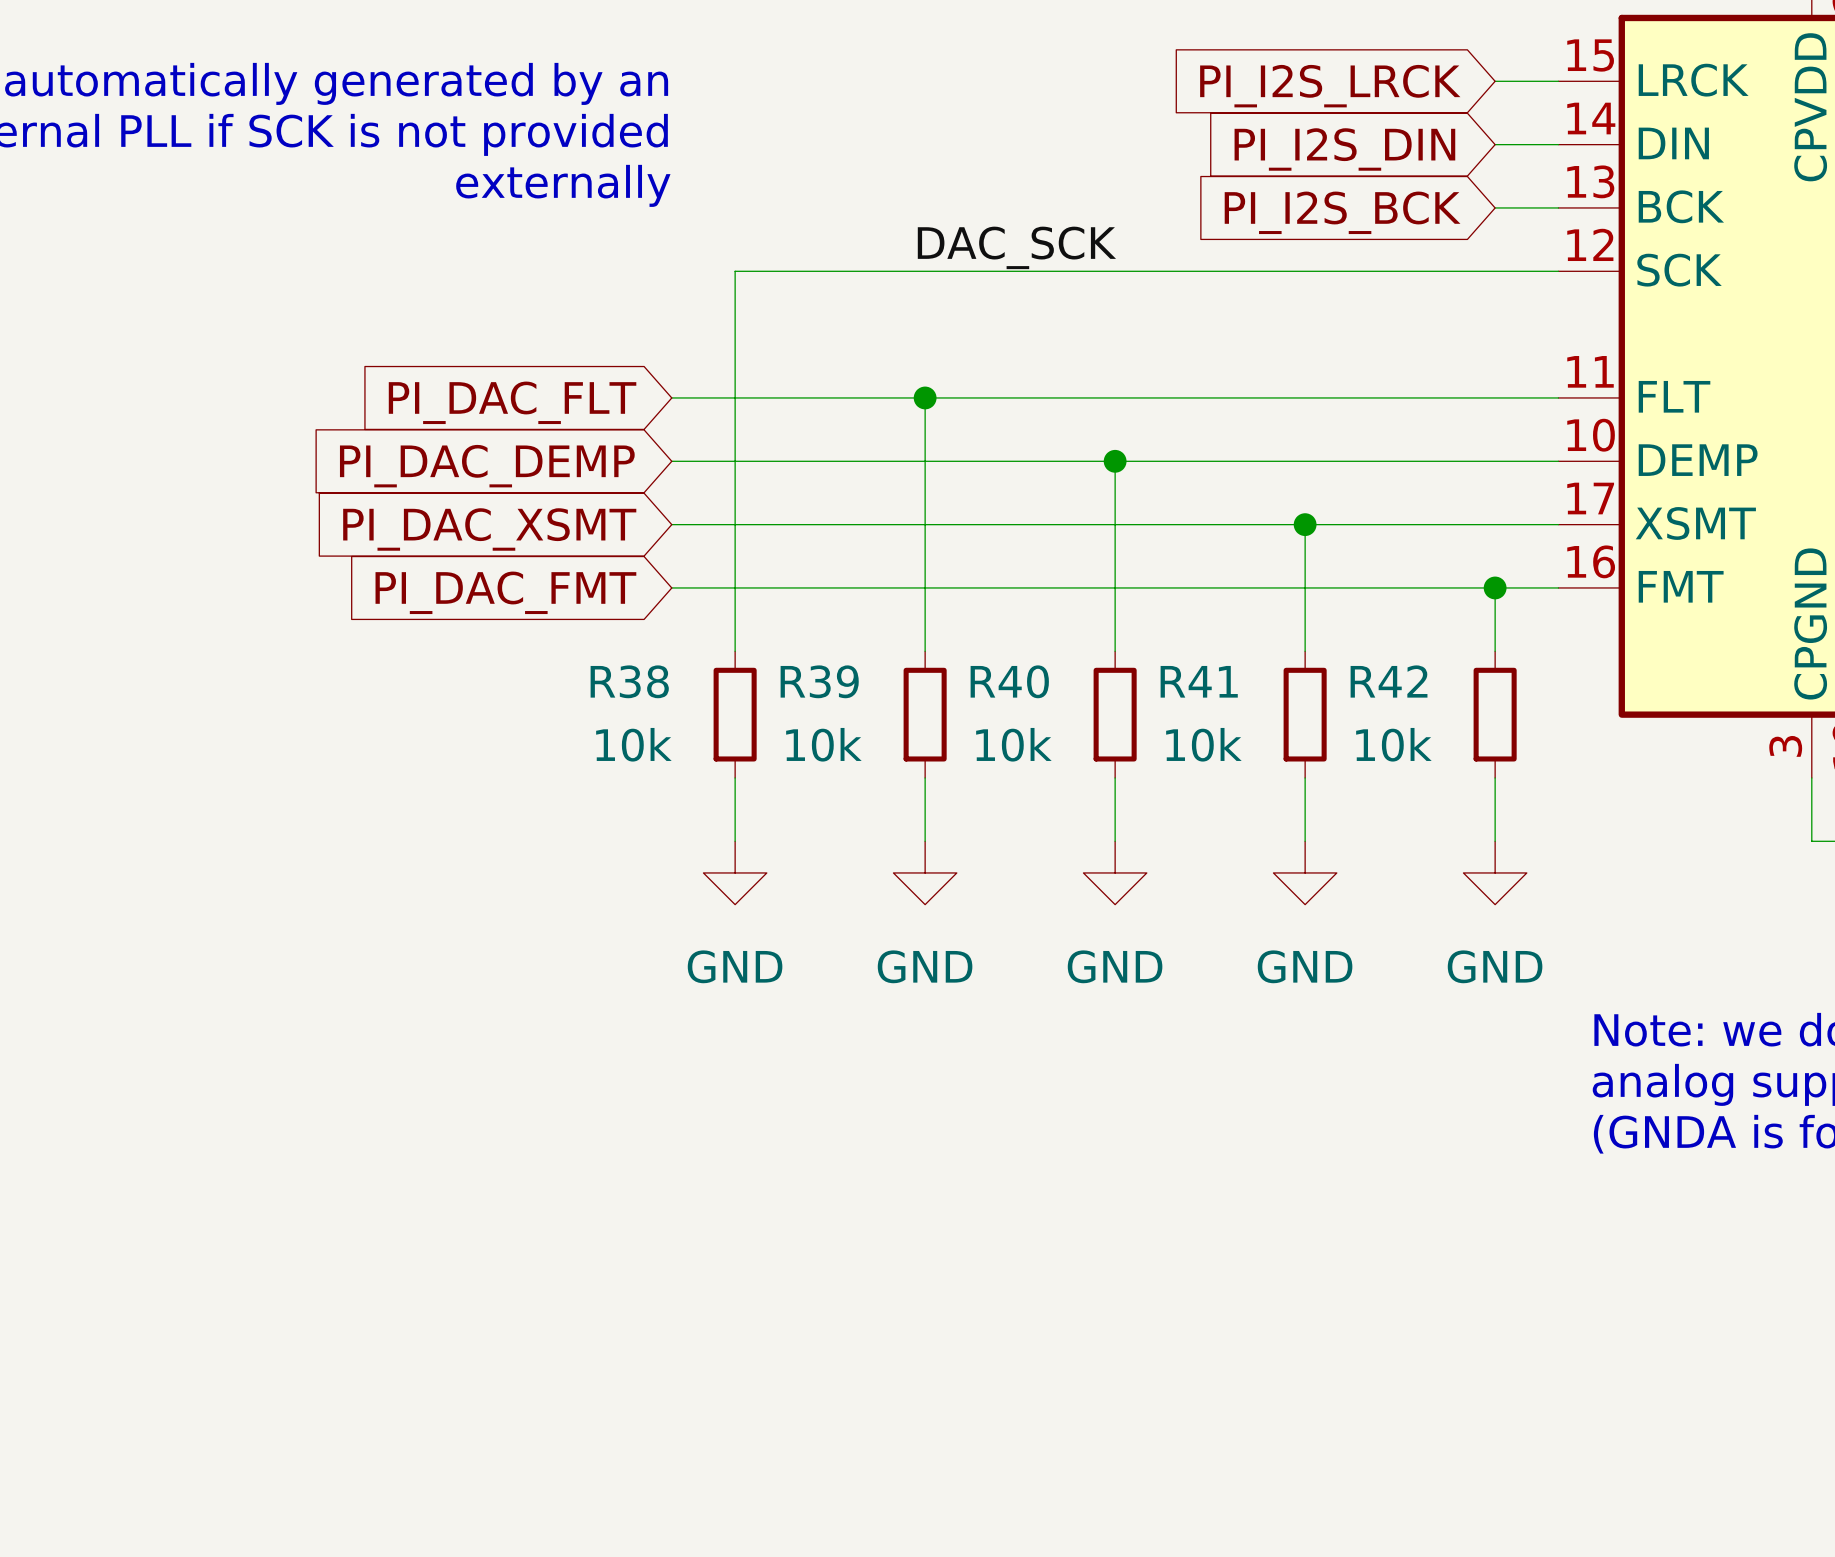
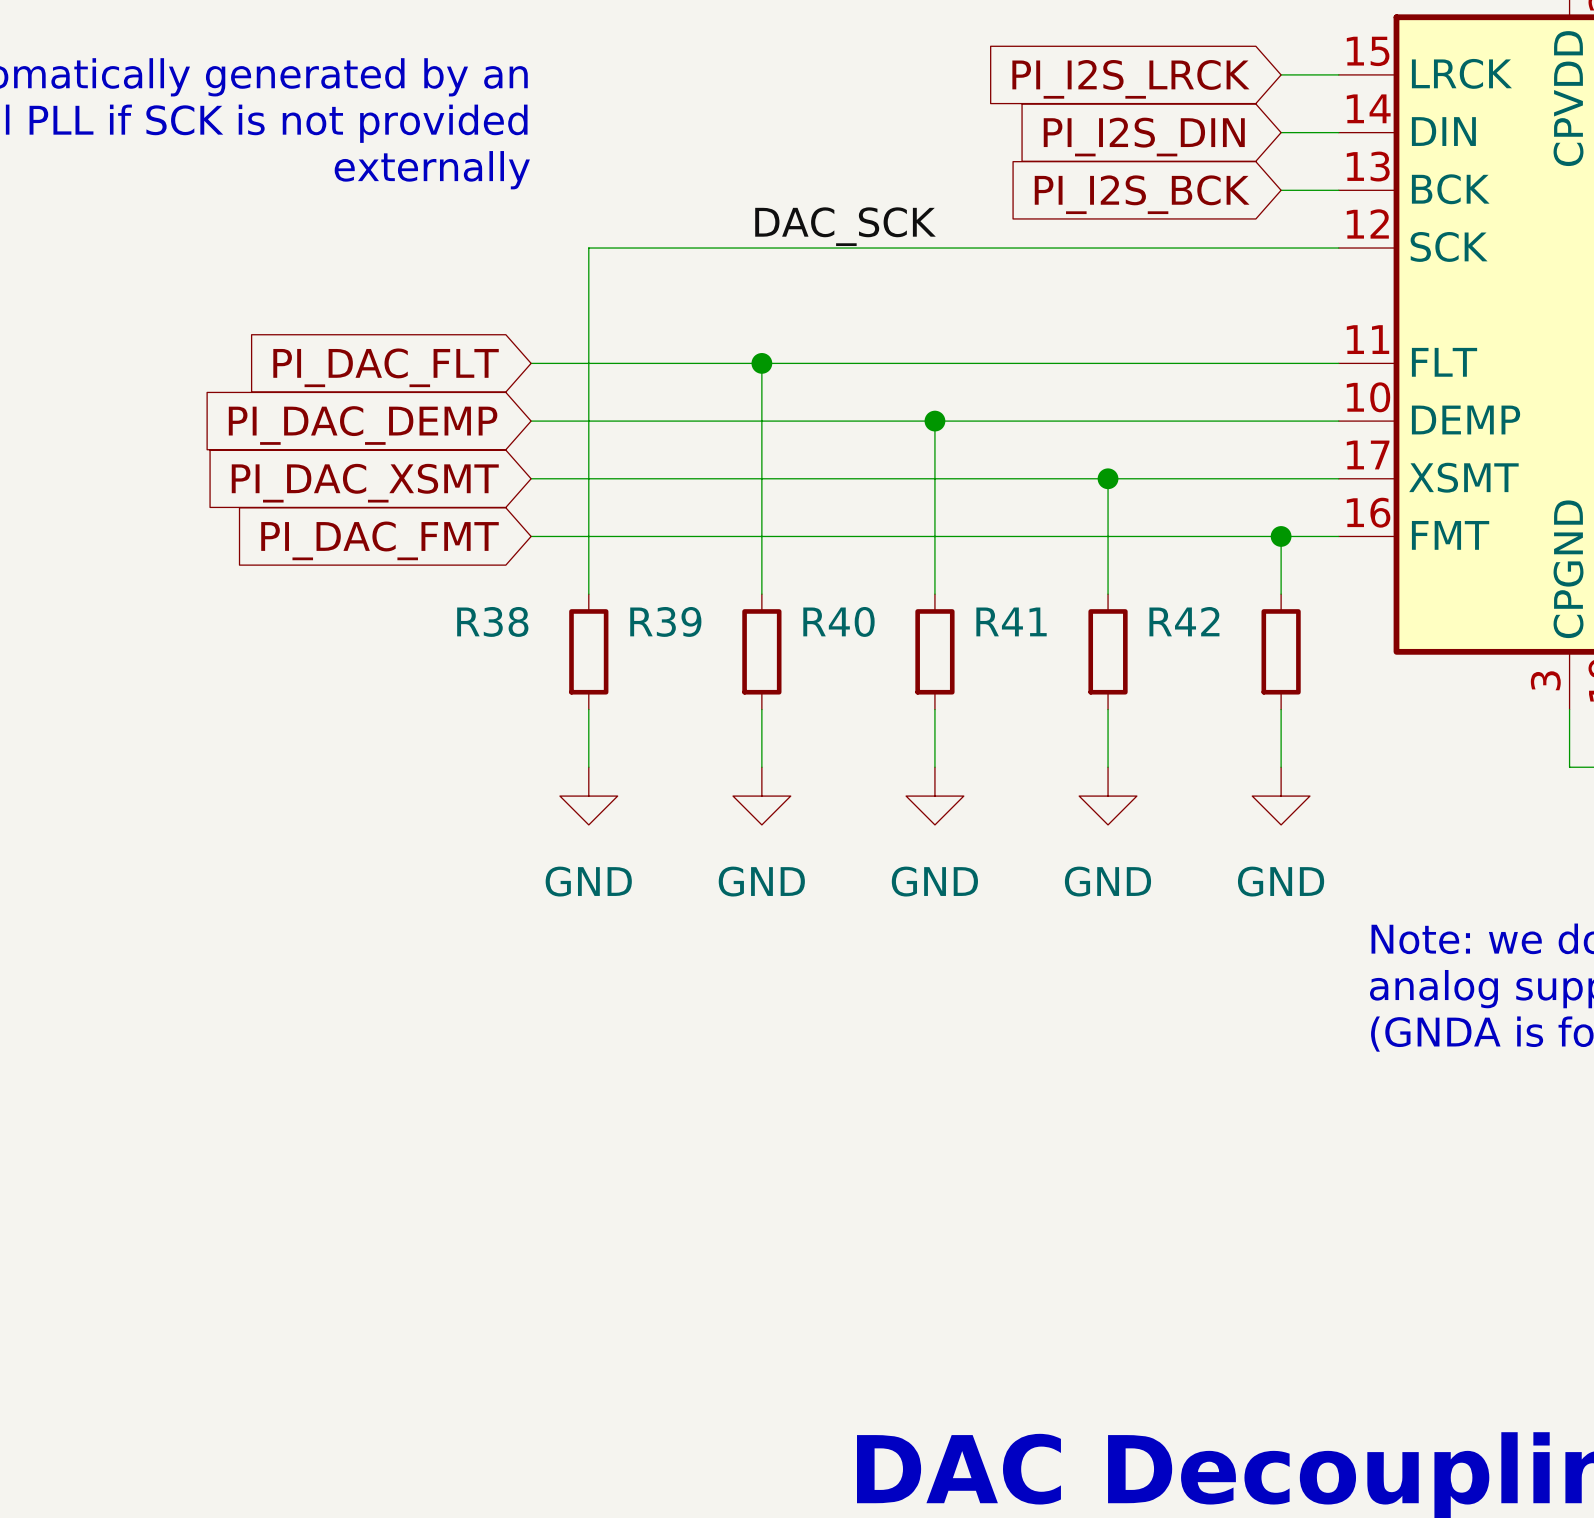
R38 value: 10k (633, 744) -> none
R39 value: 10k (823, 744) -> none
R40 value: 10k (1013, 744) -> none
R41 value: 10k (1203, 744) -> none
R42 value: 10k (1393, 744) -> none

